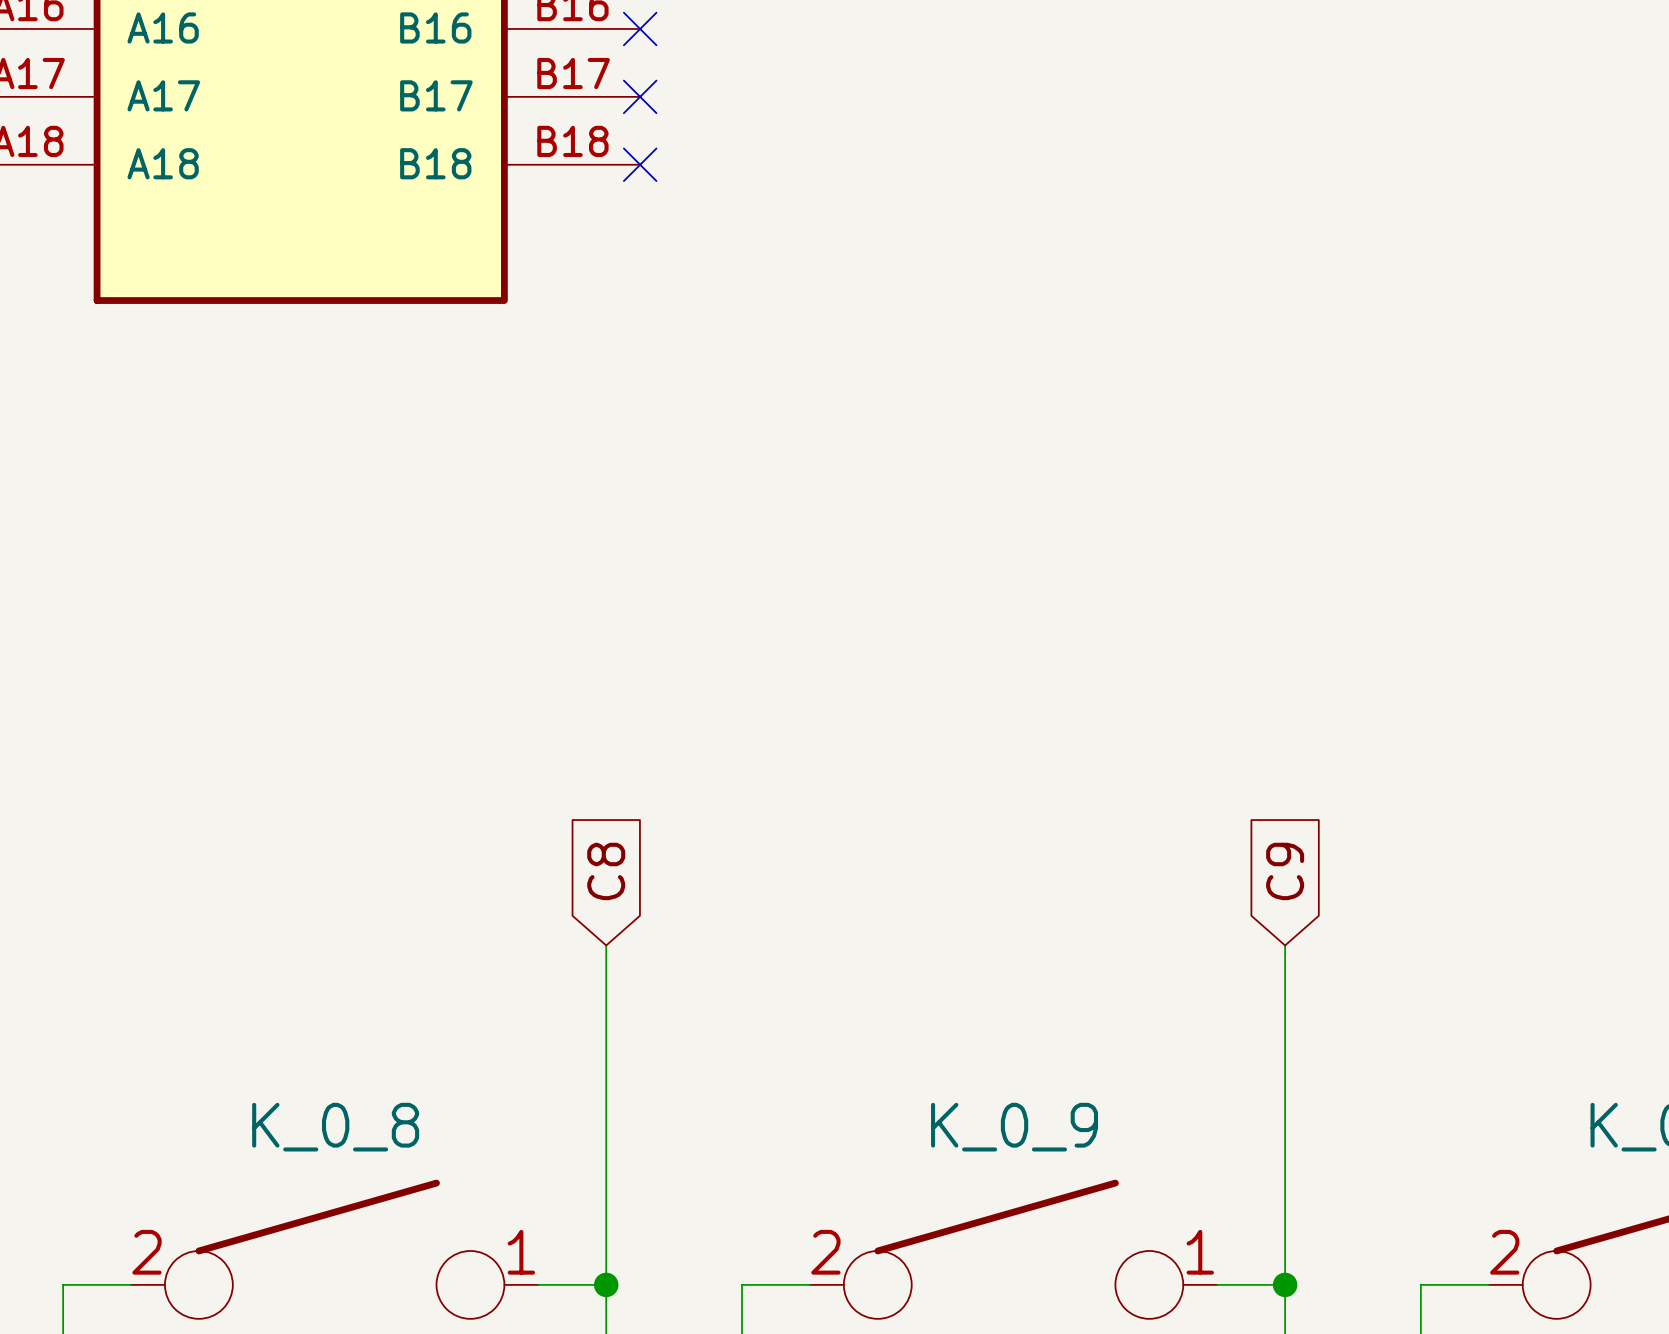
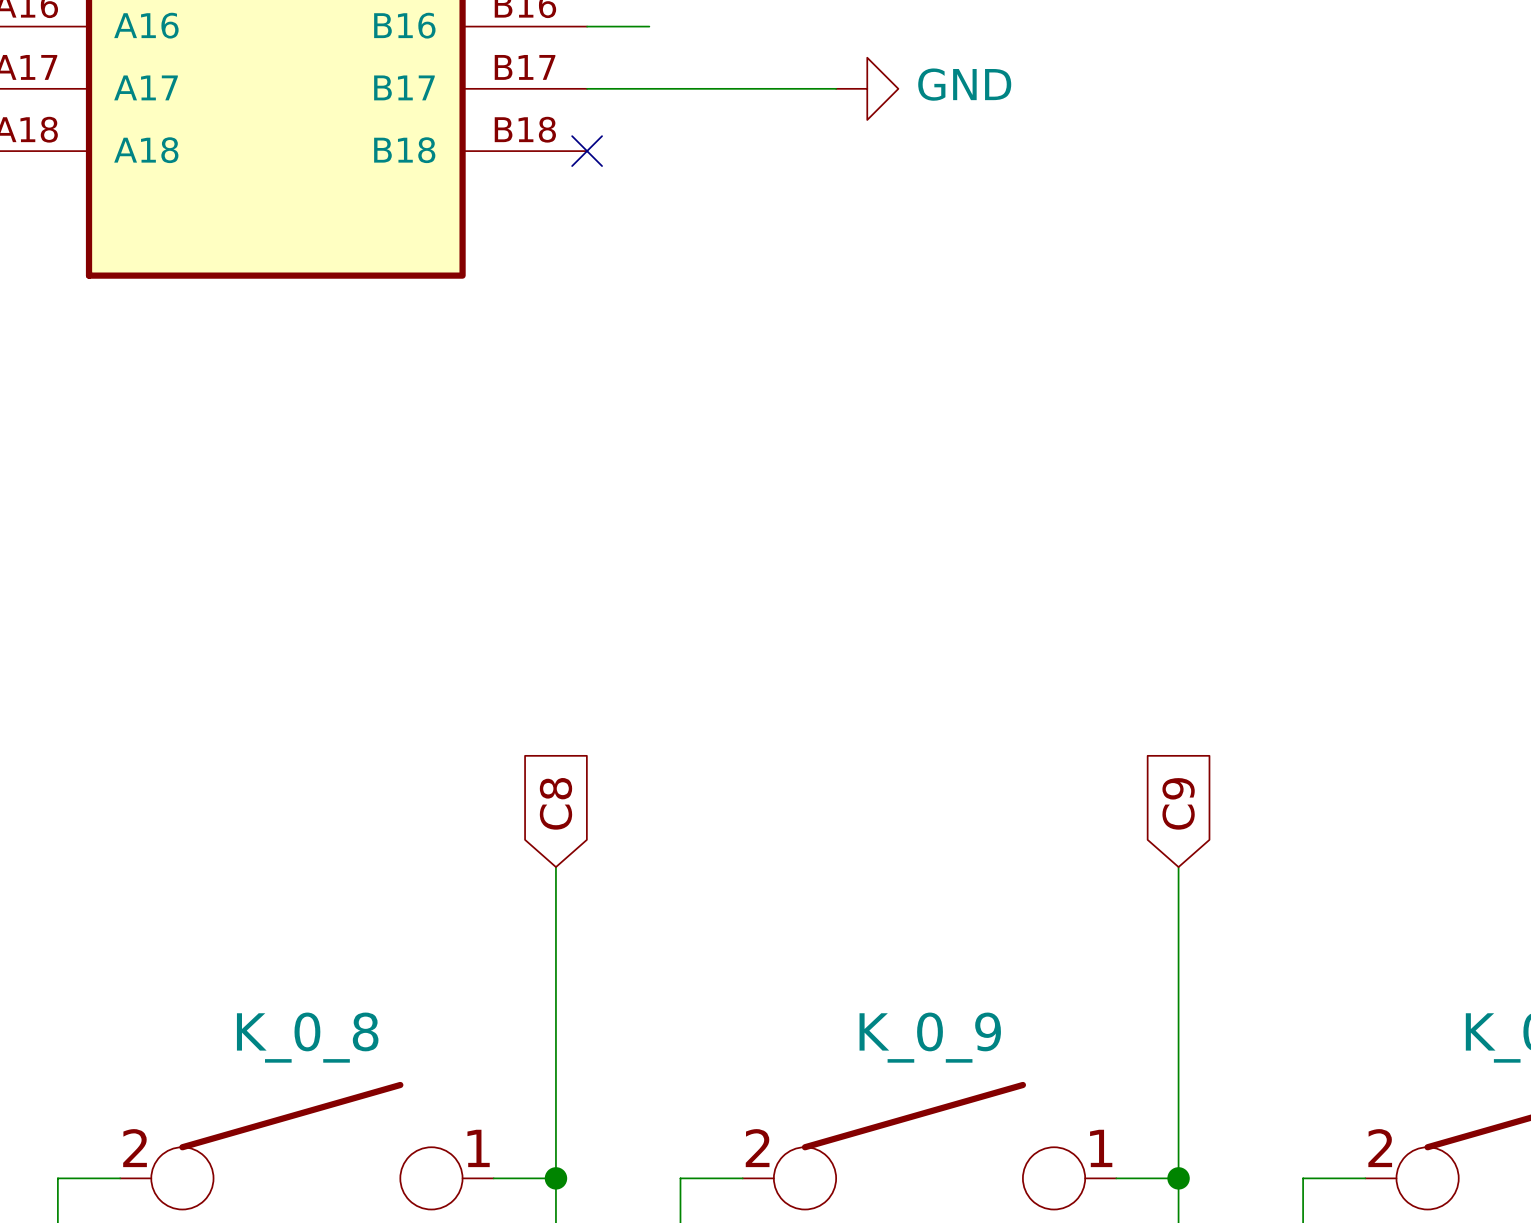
wire: none -> (587, 26) (649, 26)
no-connect mark: (640, 28) -> none
wire: none -> (587, 88) (836, 88)
no-connect mark: (640, 96) -> none
power symbol: none -> GND (867, 88)

